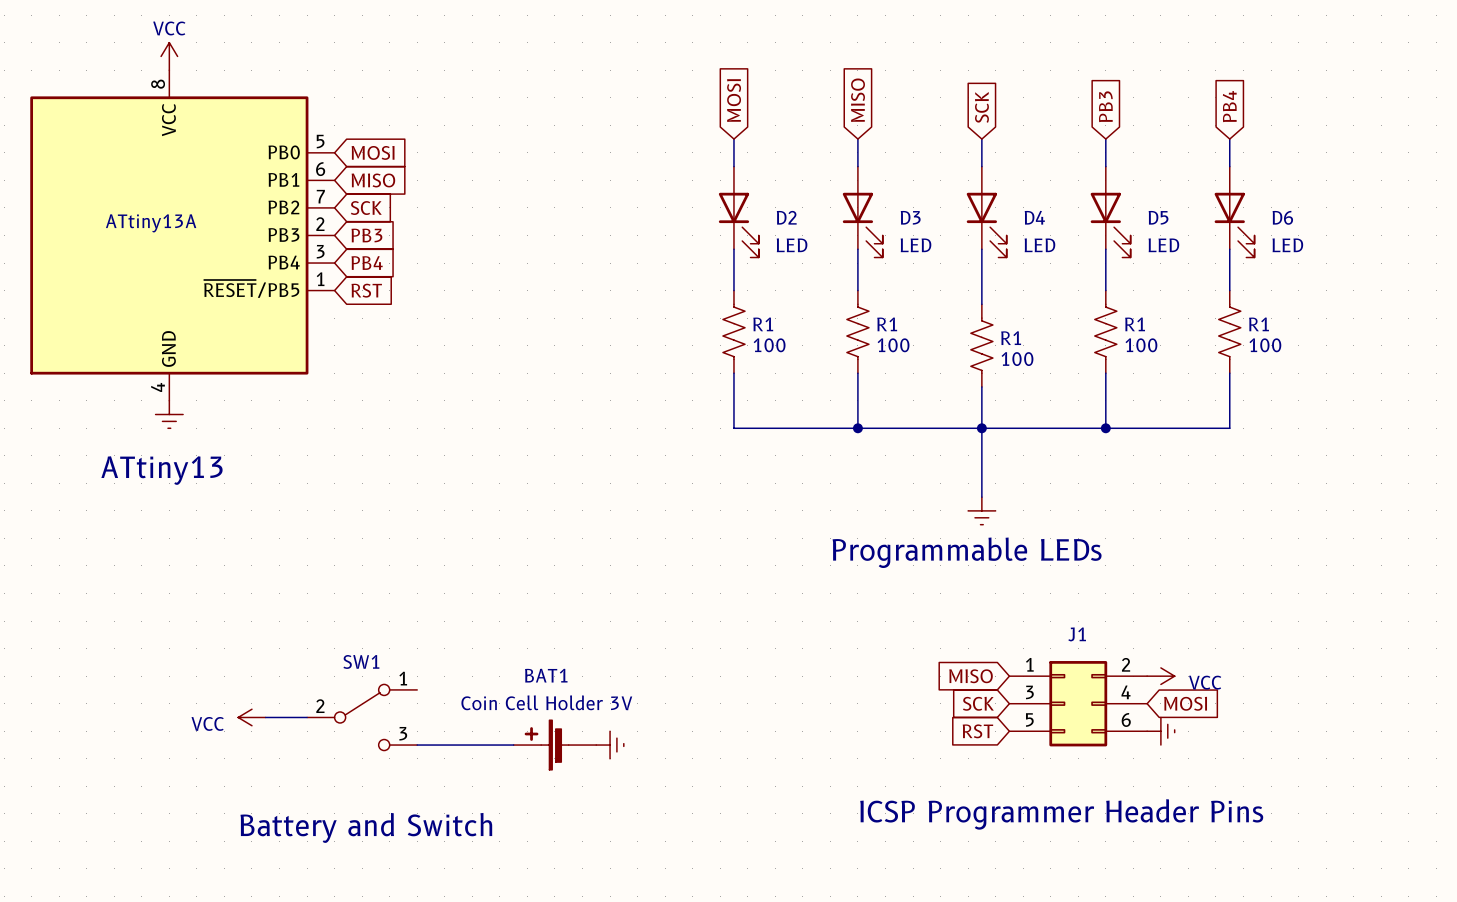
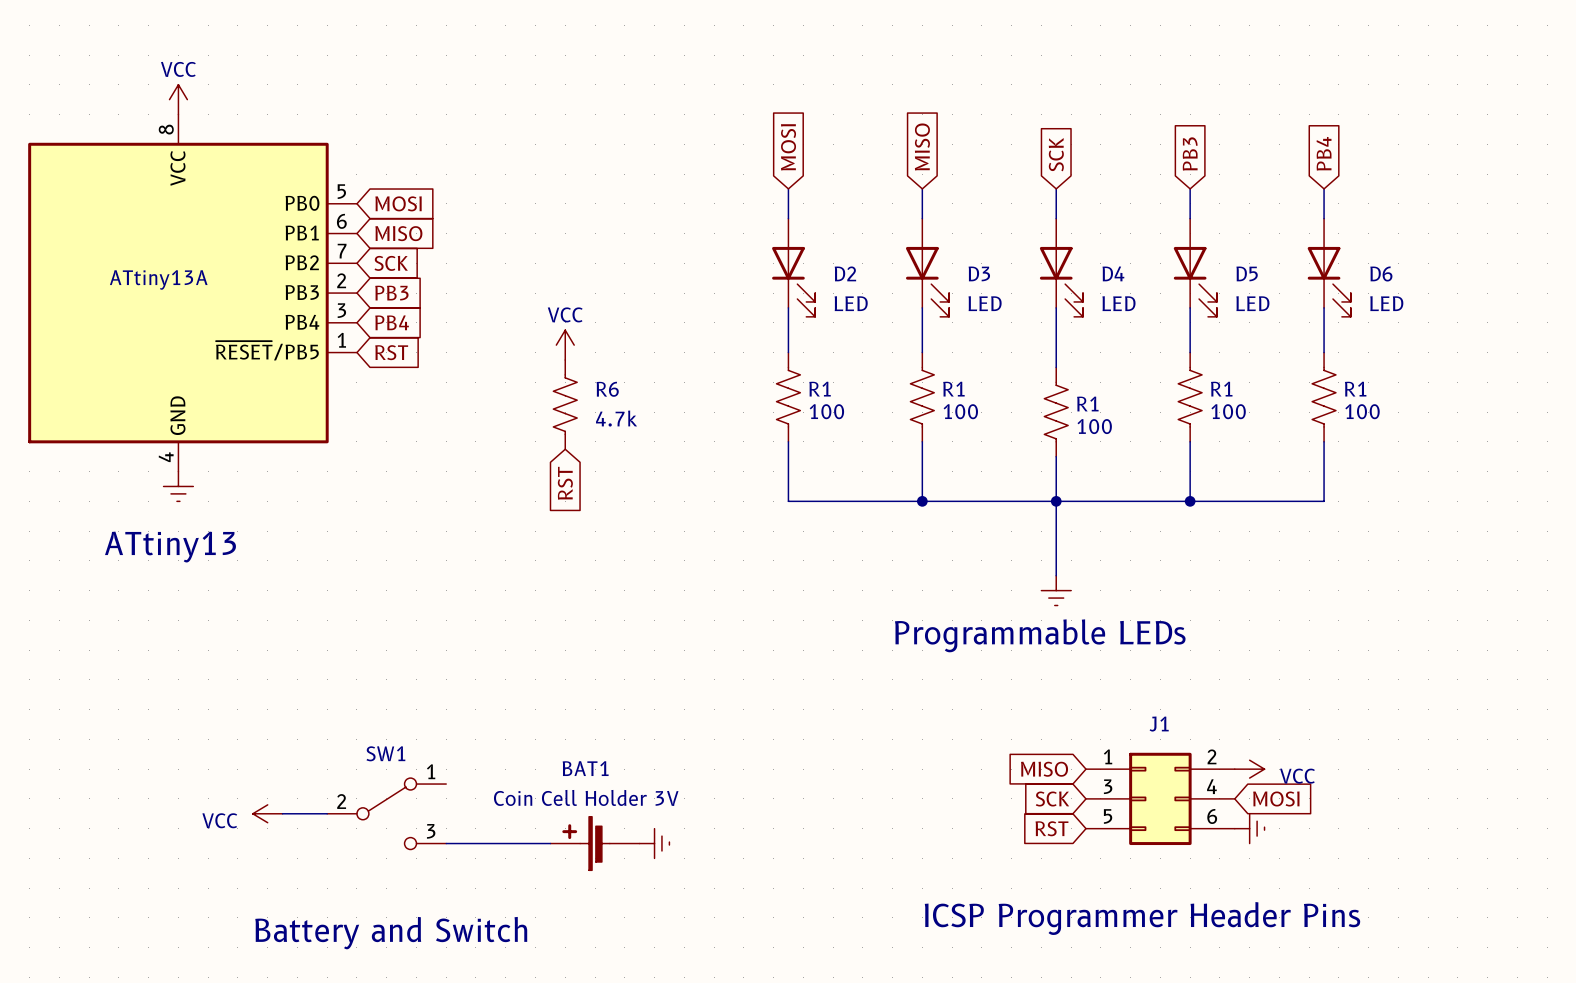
power symbol: none -> VCC (565, 345)
R6: none -> 4.7k (565, 404)
global label: none -> RST (565, 483)

